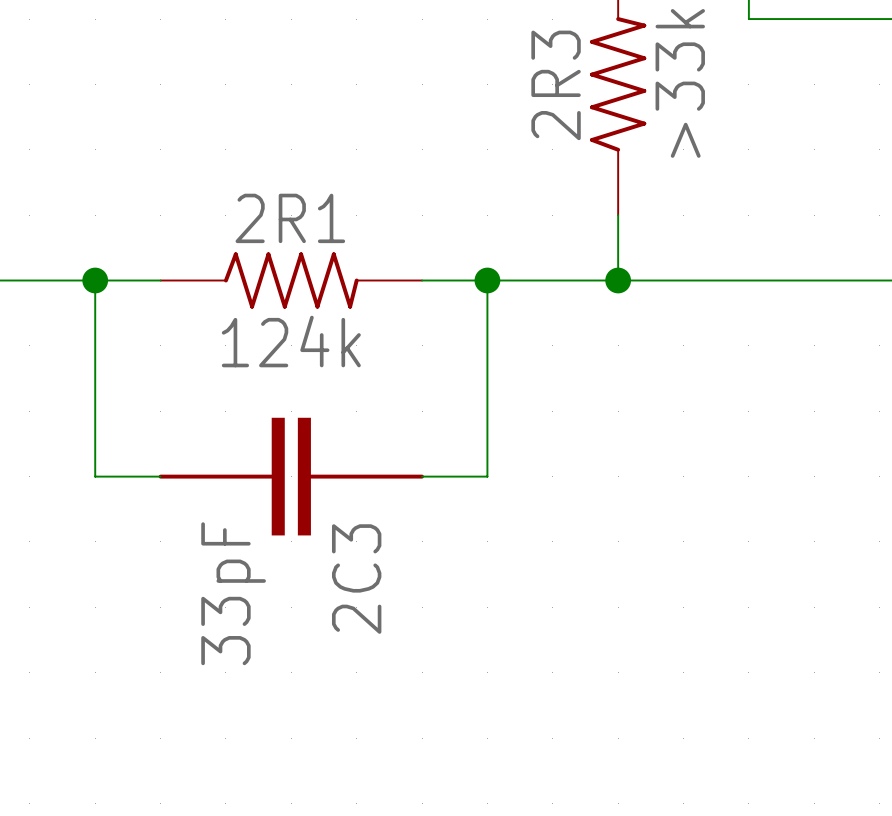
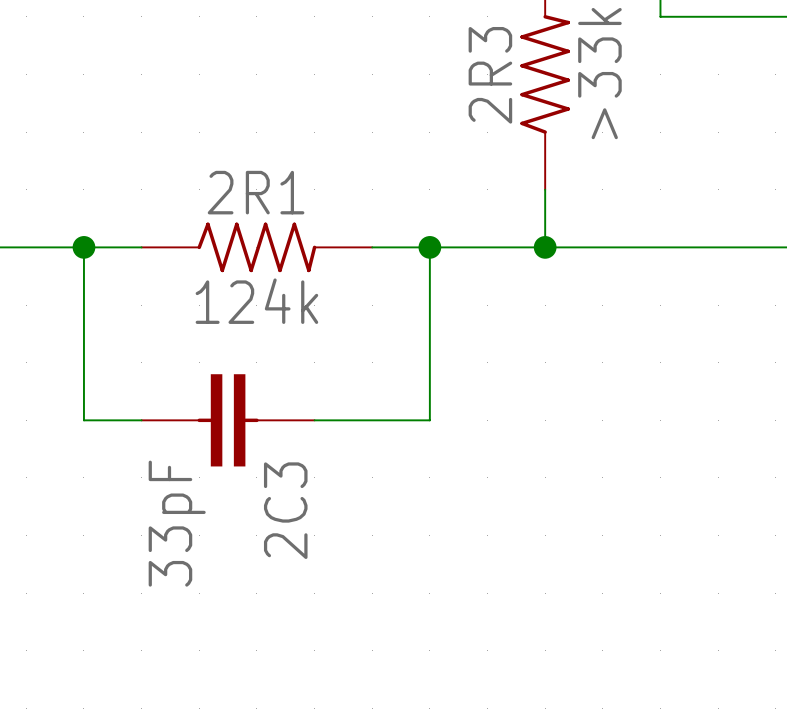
2C3 symbol: [158, 417, 425, 536] -> [141, 374, 315, 467]

